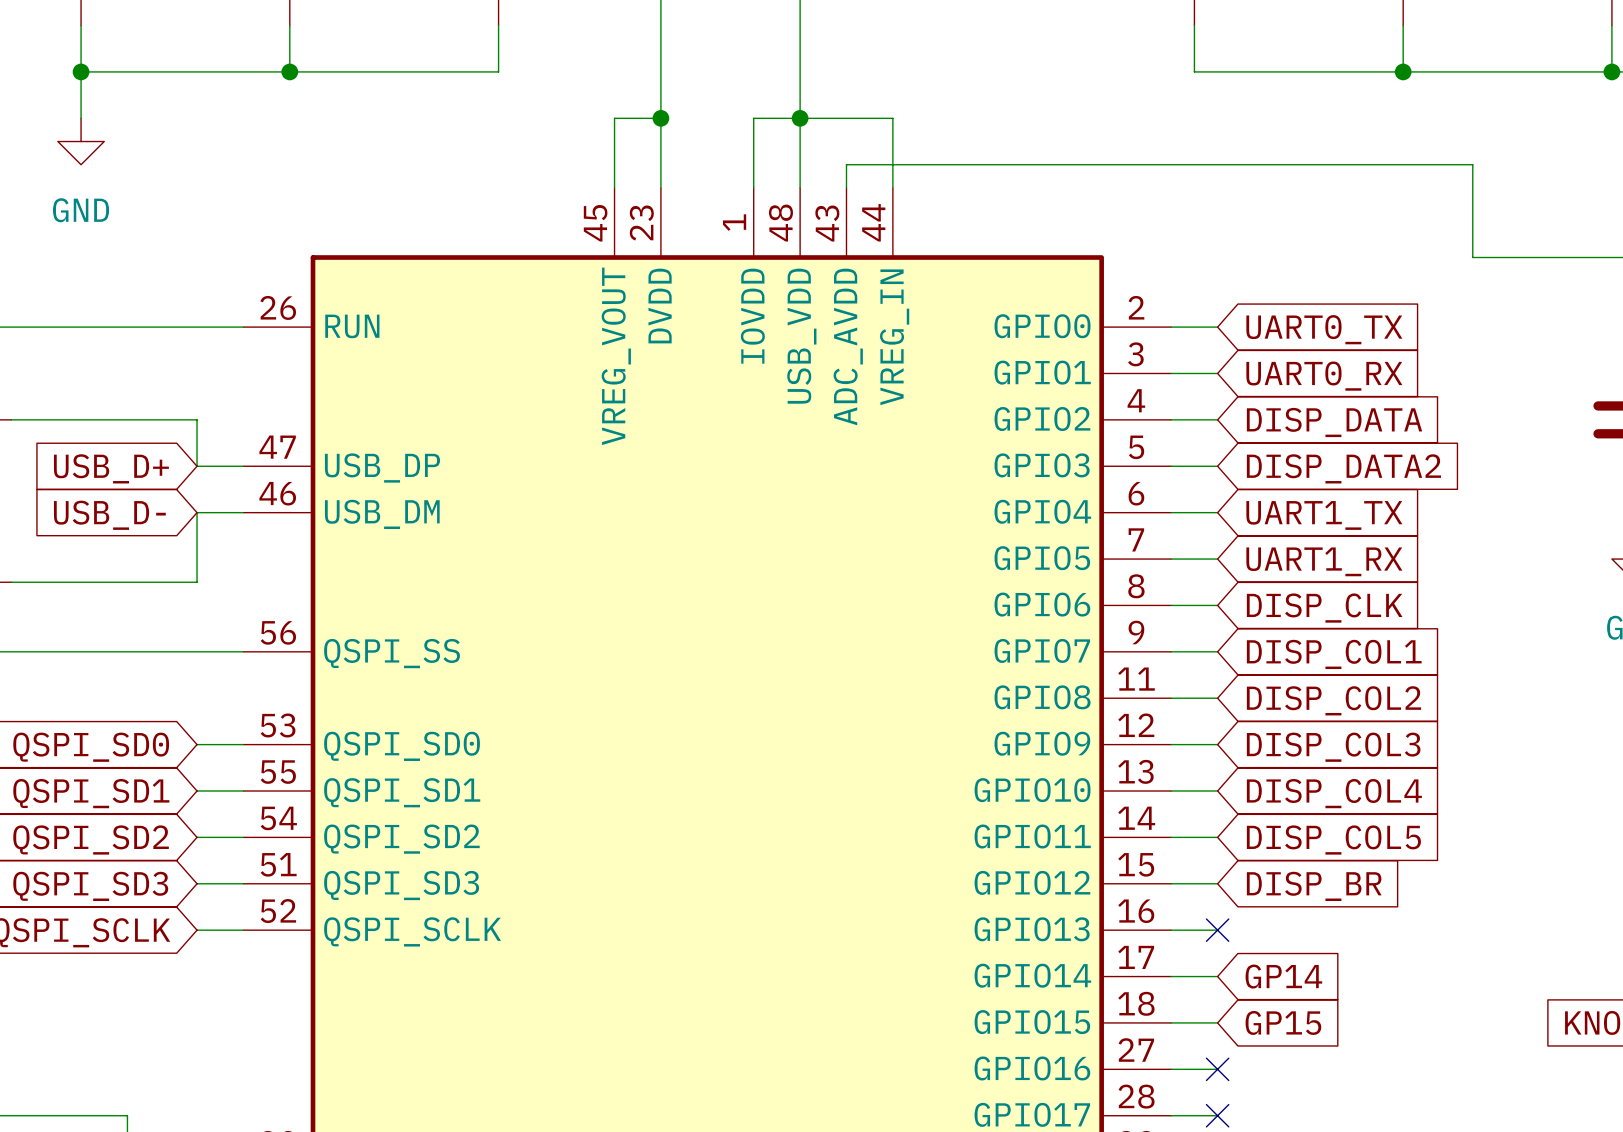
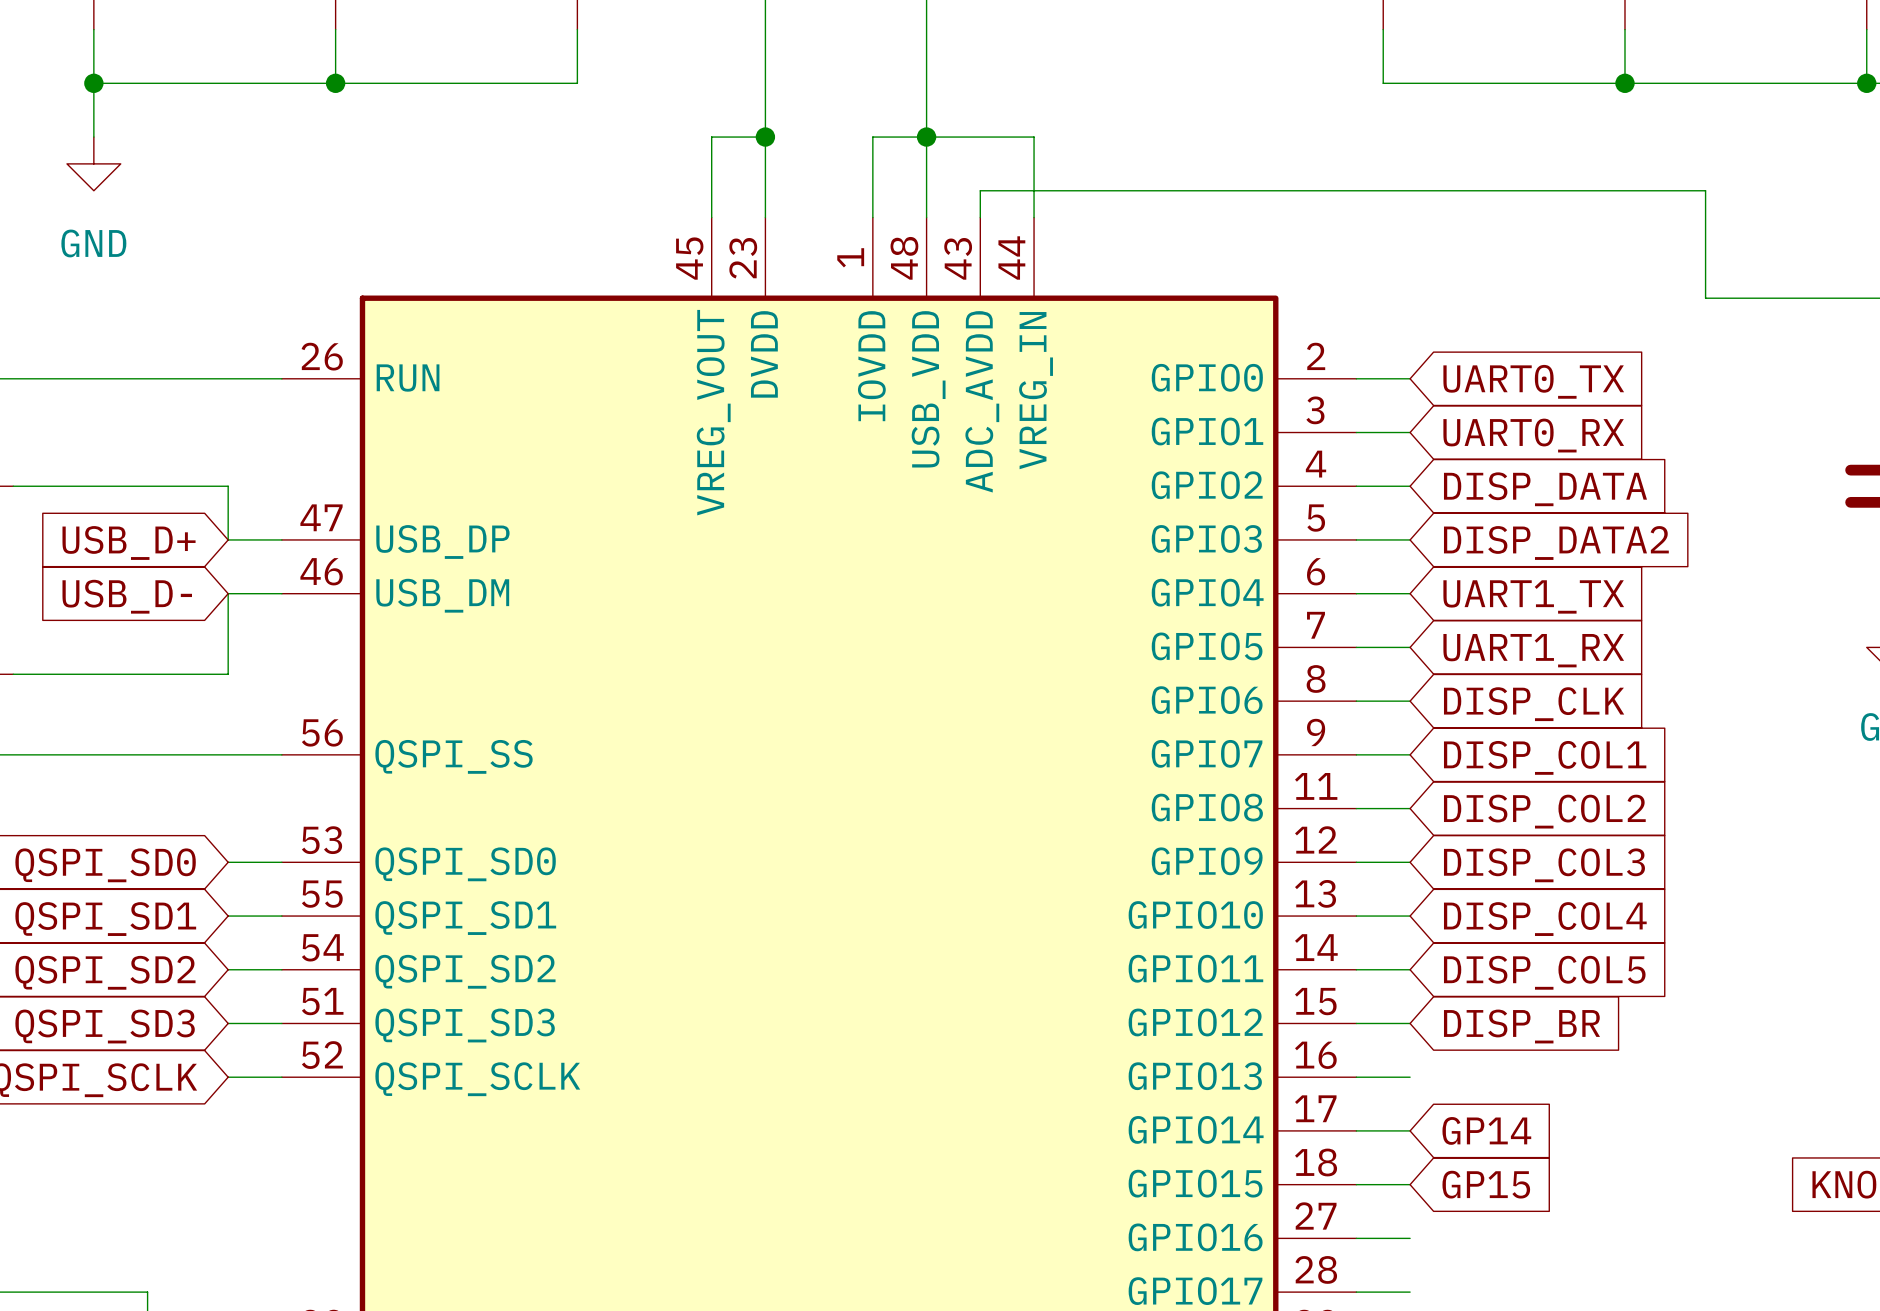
no-connect mark: (1217, 930) -> none
no-connect mark: (1217, 1069) -> none
no-connect mark: (1217, 1115) -> none

